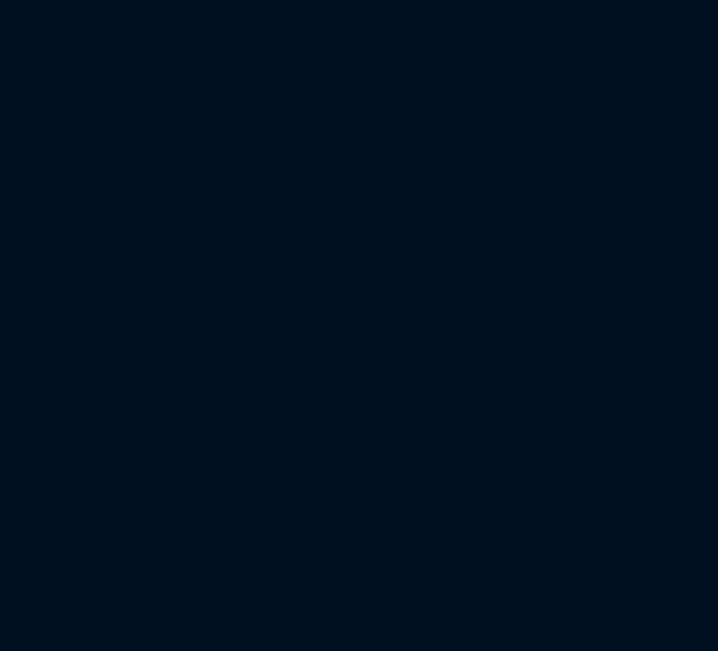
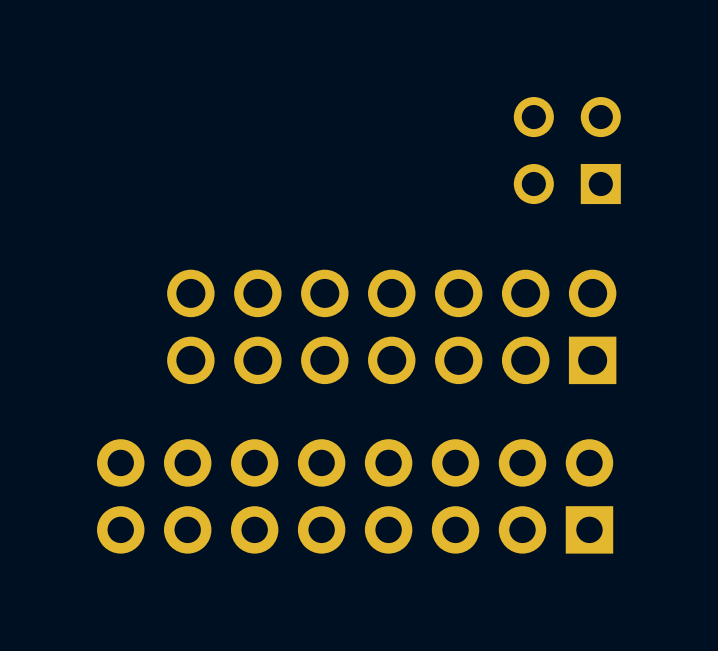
part: none -> (567, 150)
part: none -> (391, 326)
part: none -> (355, 496)

